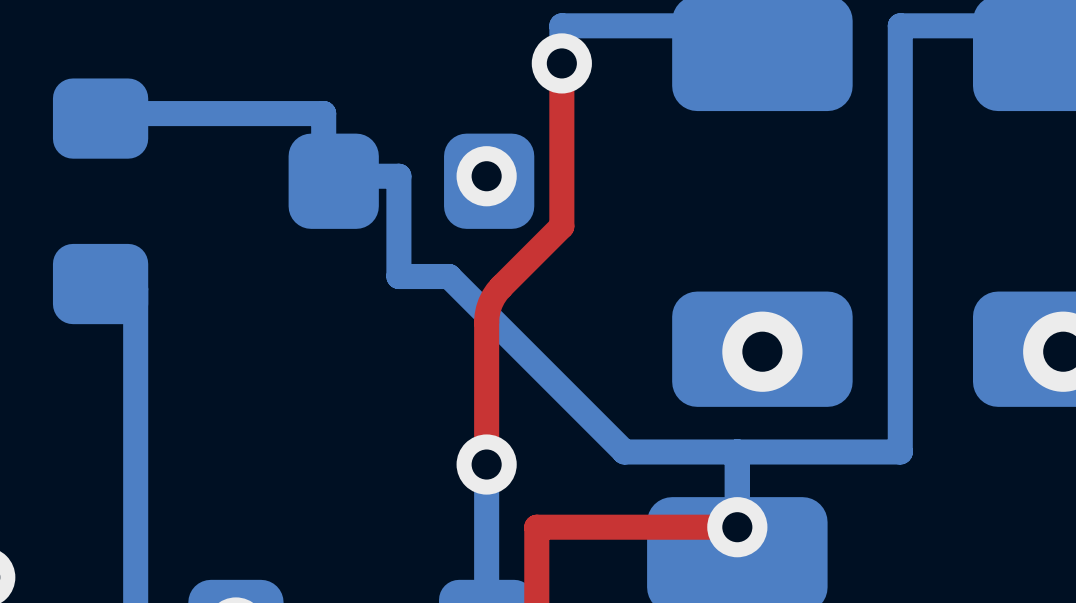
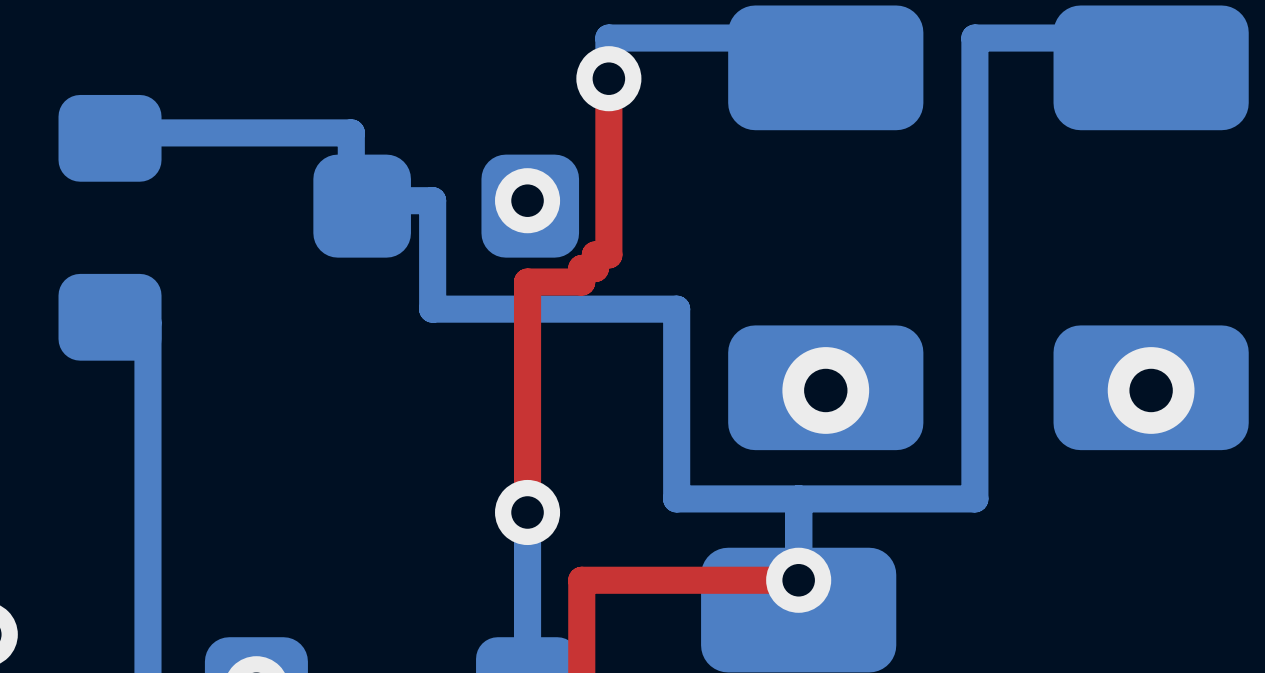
top track: (561, 226) (497, 291) (488, 309) (486, 322) -> (608, 254) (595, 254) (595, 268) (581, 268) (581, 282) (527, 282) (527, 358)
bottom track: (449, 276) (624, 451) -> (486, 309) (676, 309) (676, 498)

